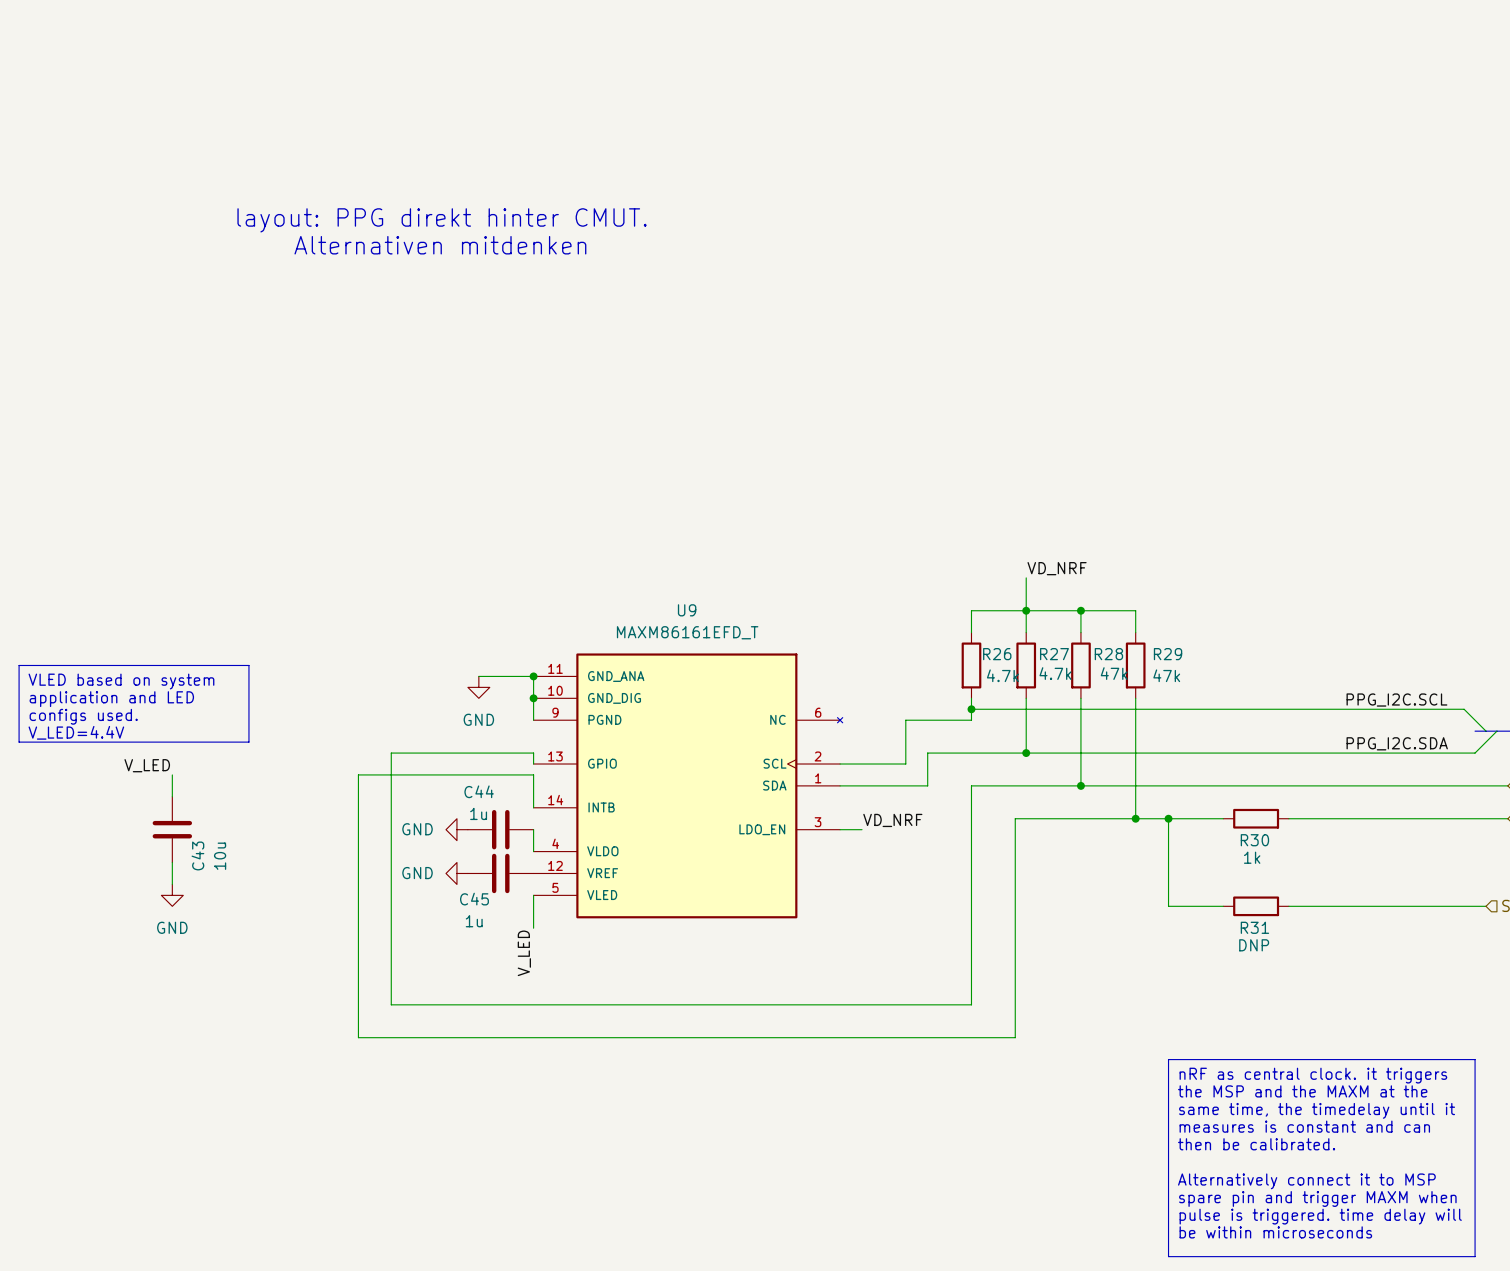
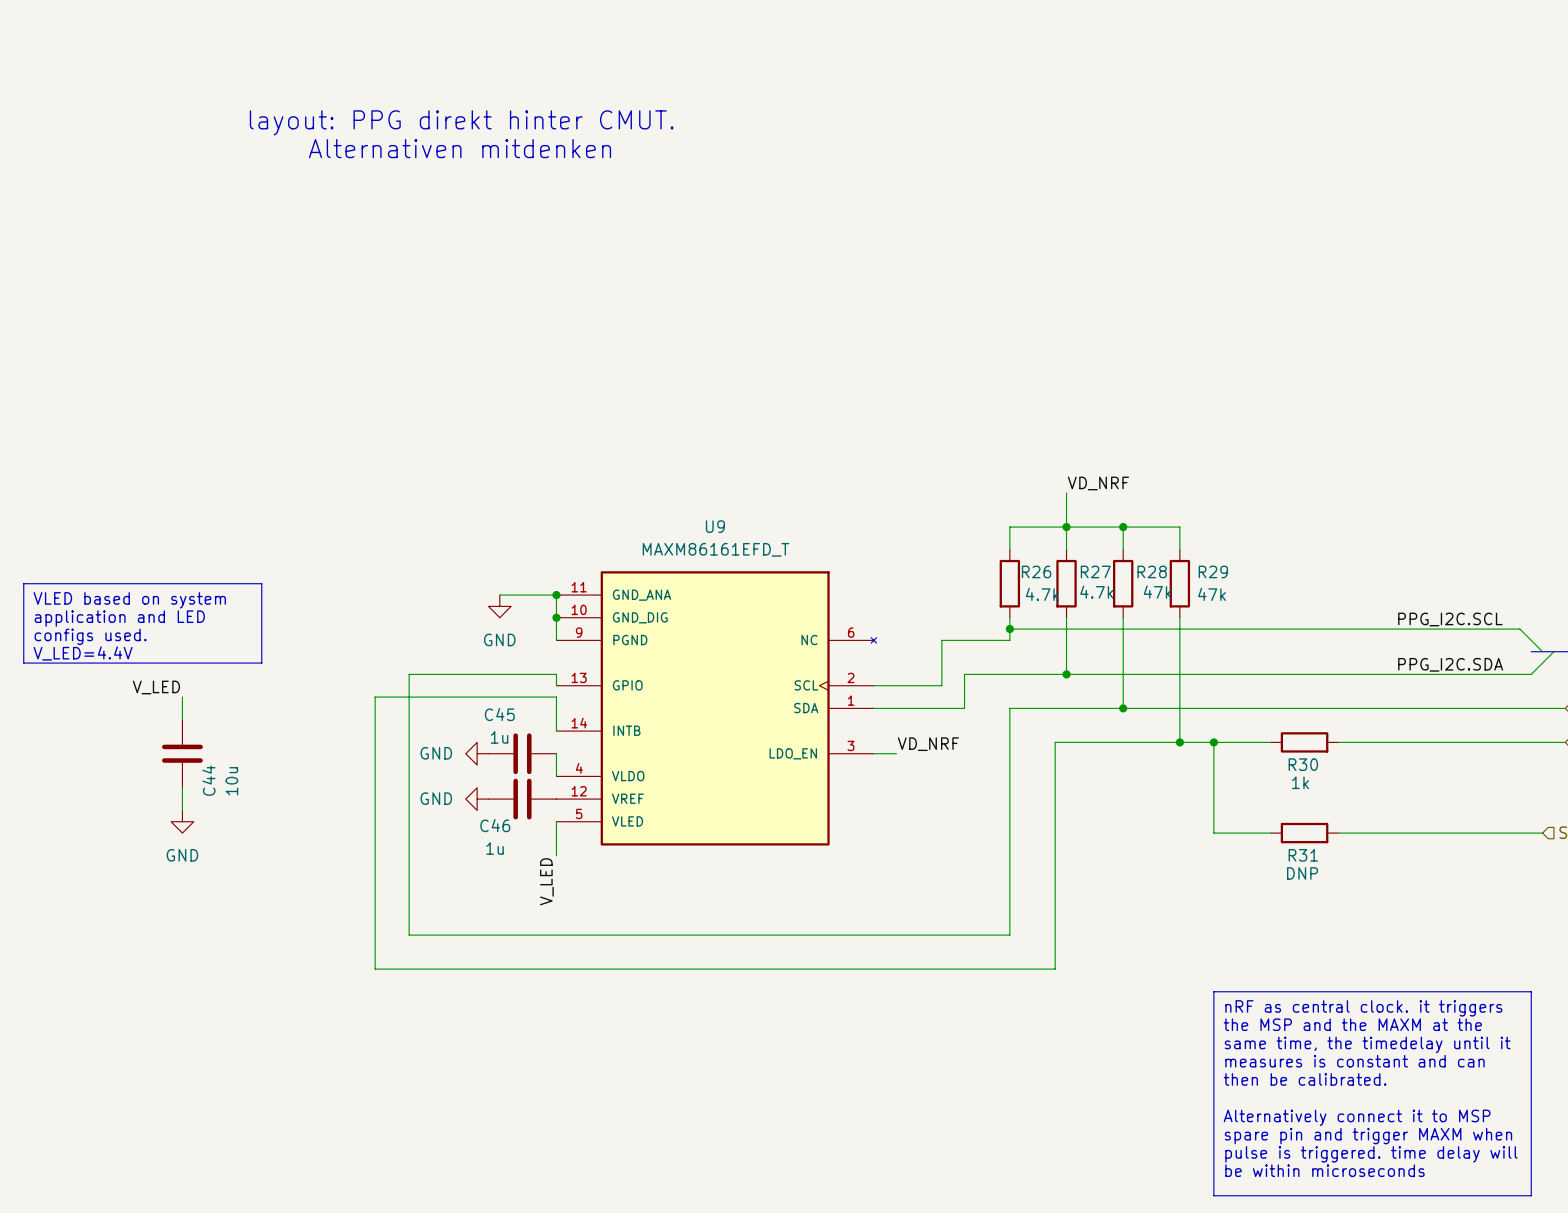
C44 name: C44 (479, 791) -> C45 (499, 714)
C43 name: C43 (197, 855) -> C44 (208, 780)
C45 name: C45 (474, 899) -> C46 (495, 825)

